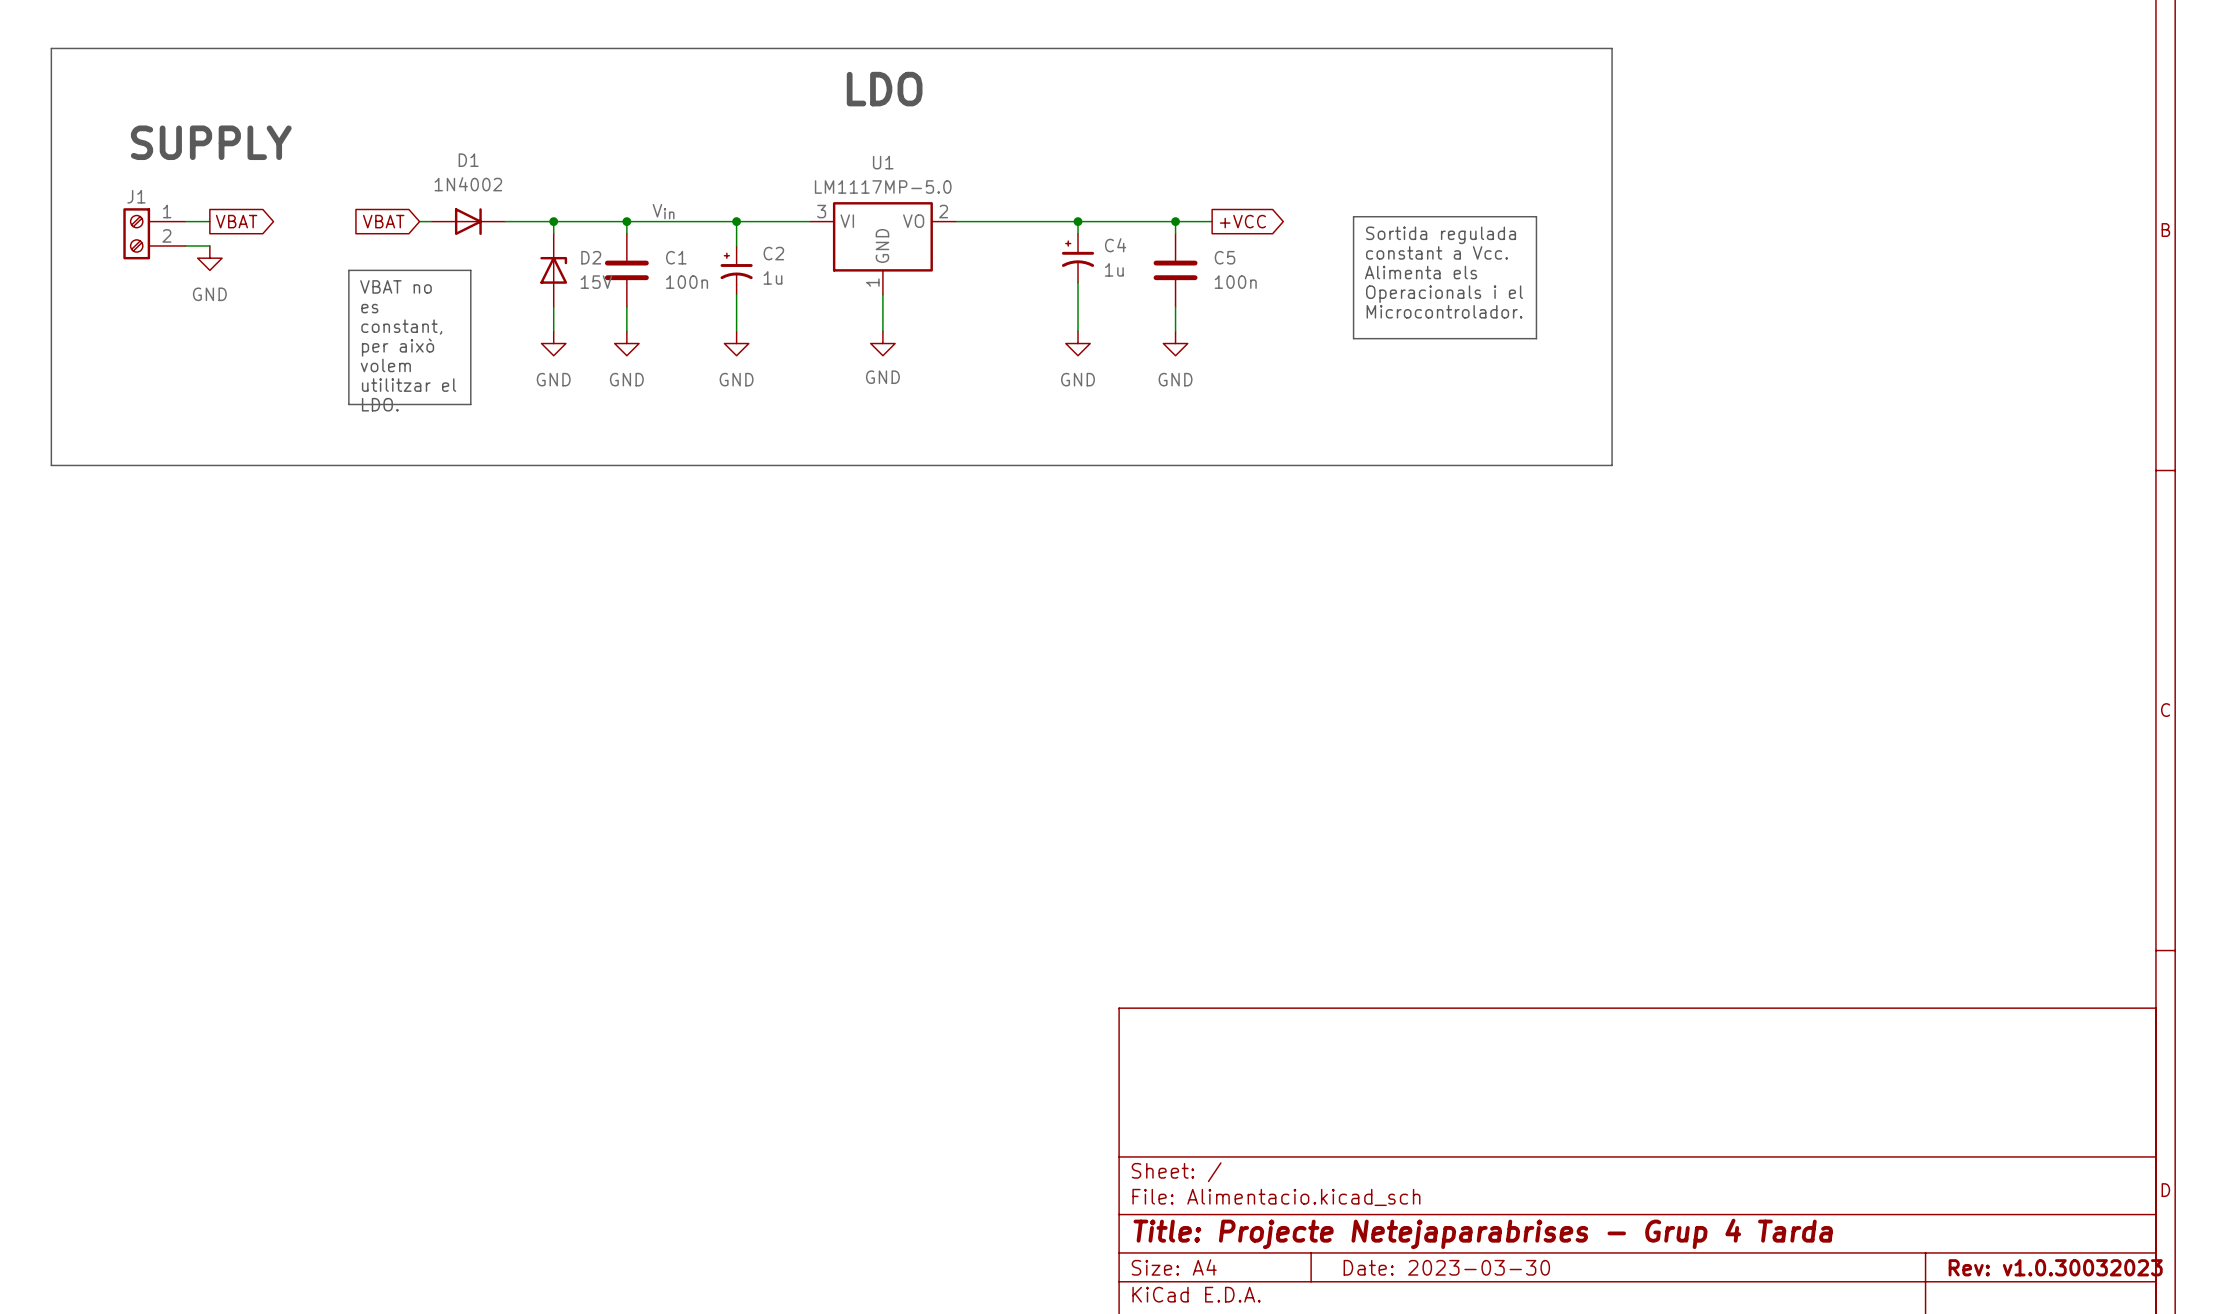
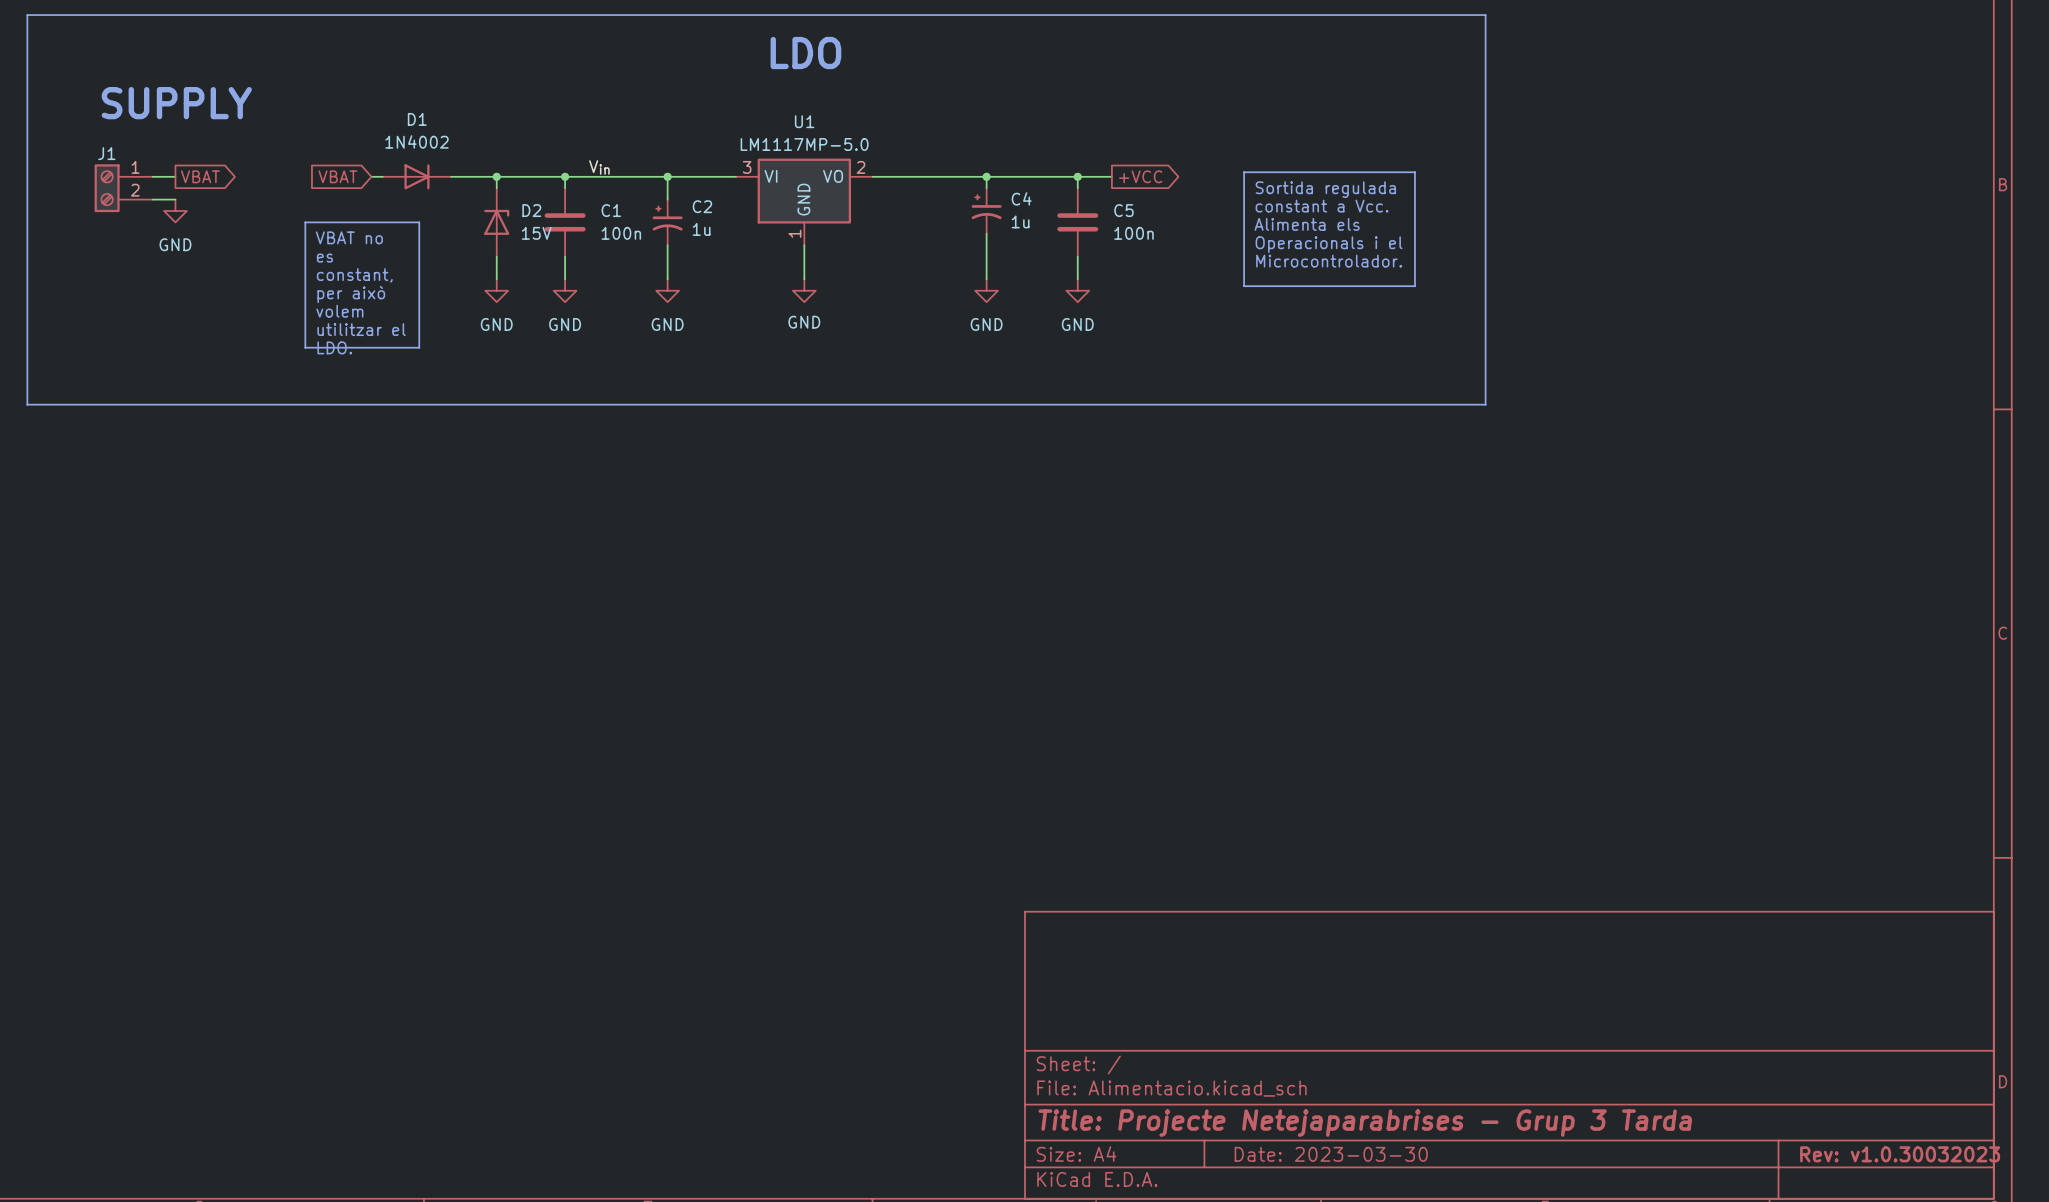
title block: Title: Projecte Netejaparabrises - Grup 4 Tarda (1483, 1233) -> Title: Projecte Netejaparabrises - Grup 3 Tarda (1365, 1123)

